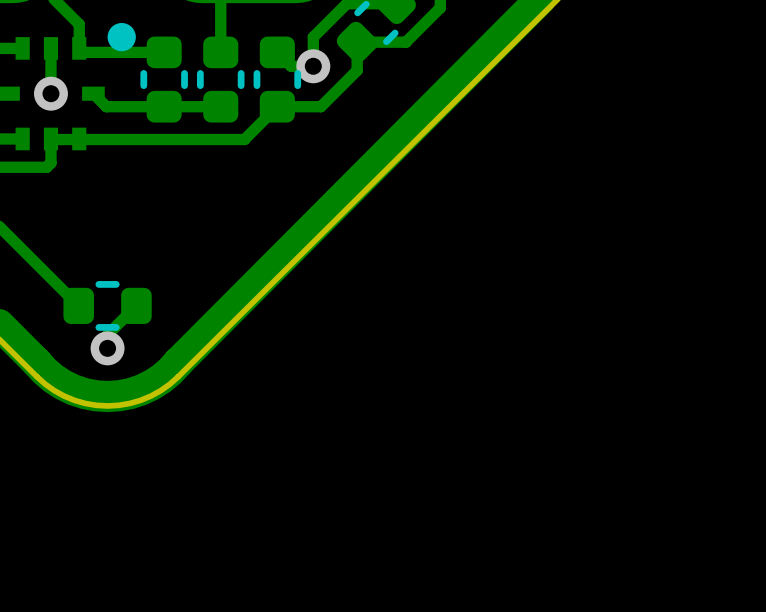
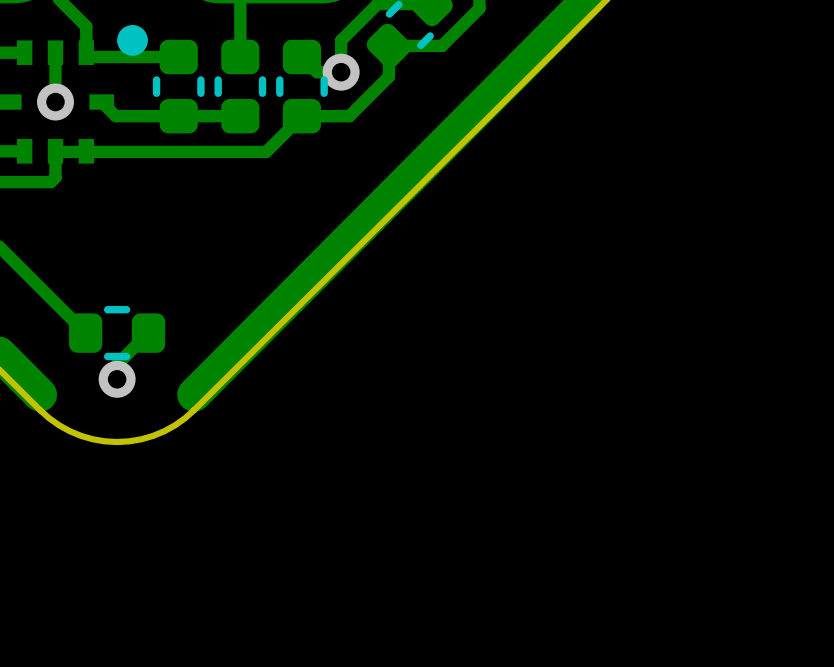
track: (178, 362) (151, 384) (130, 393) (107, 396) (73, 389) (53, 378) (36, 362) -> none

